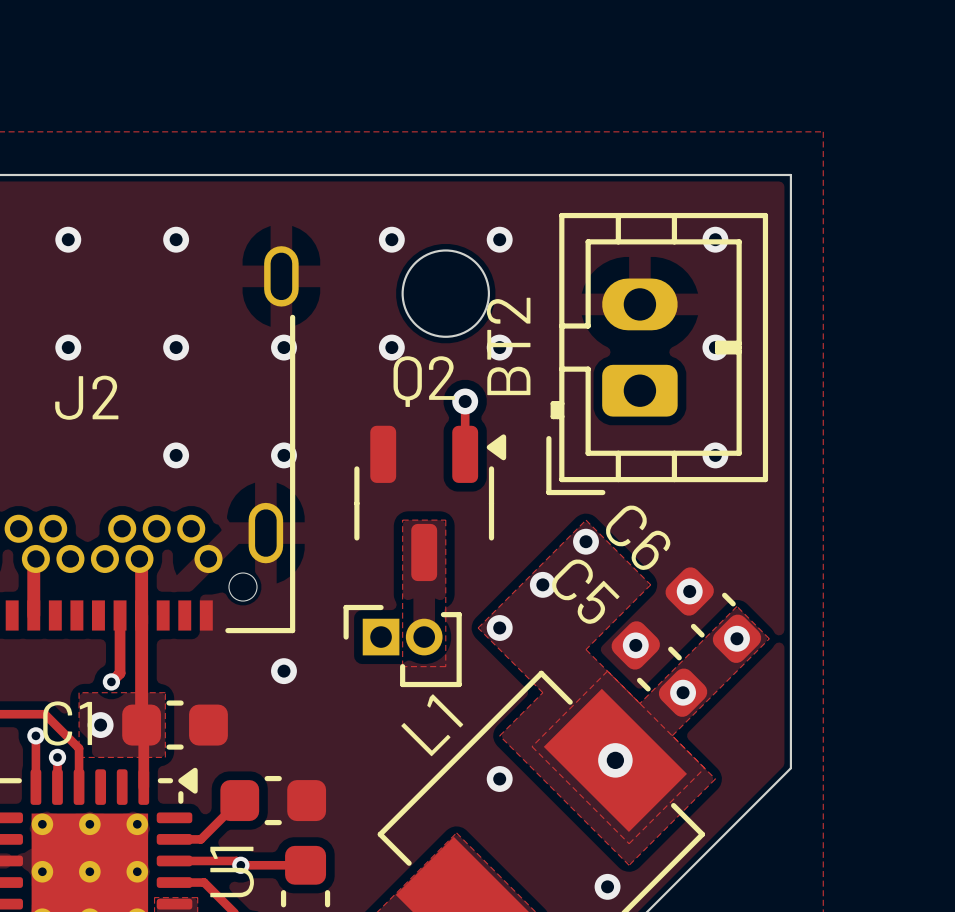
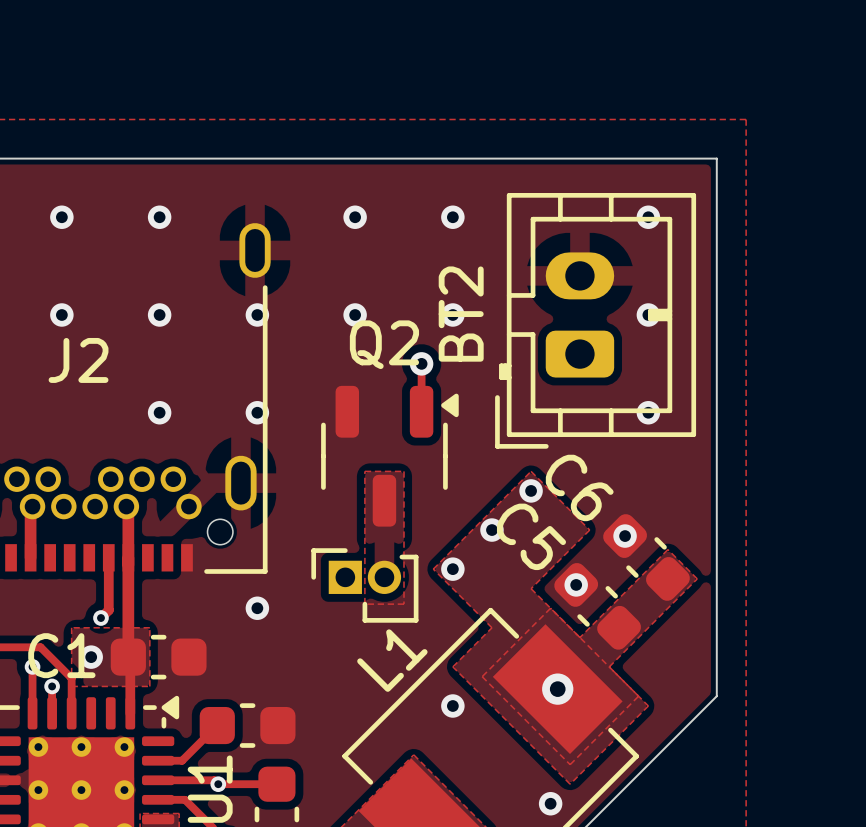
round board edge: [401, 249, 490, 338] -> none
via: (736, 638) -> none
via: (683, 692) -> none

